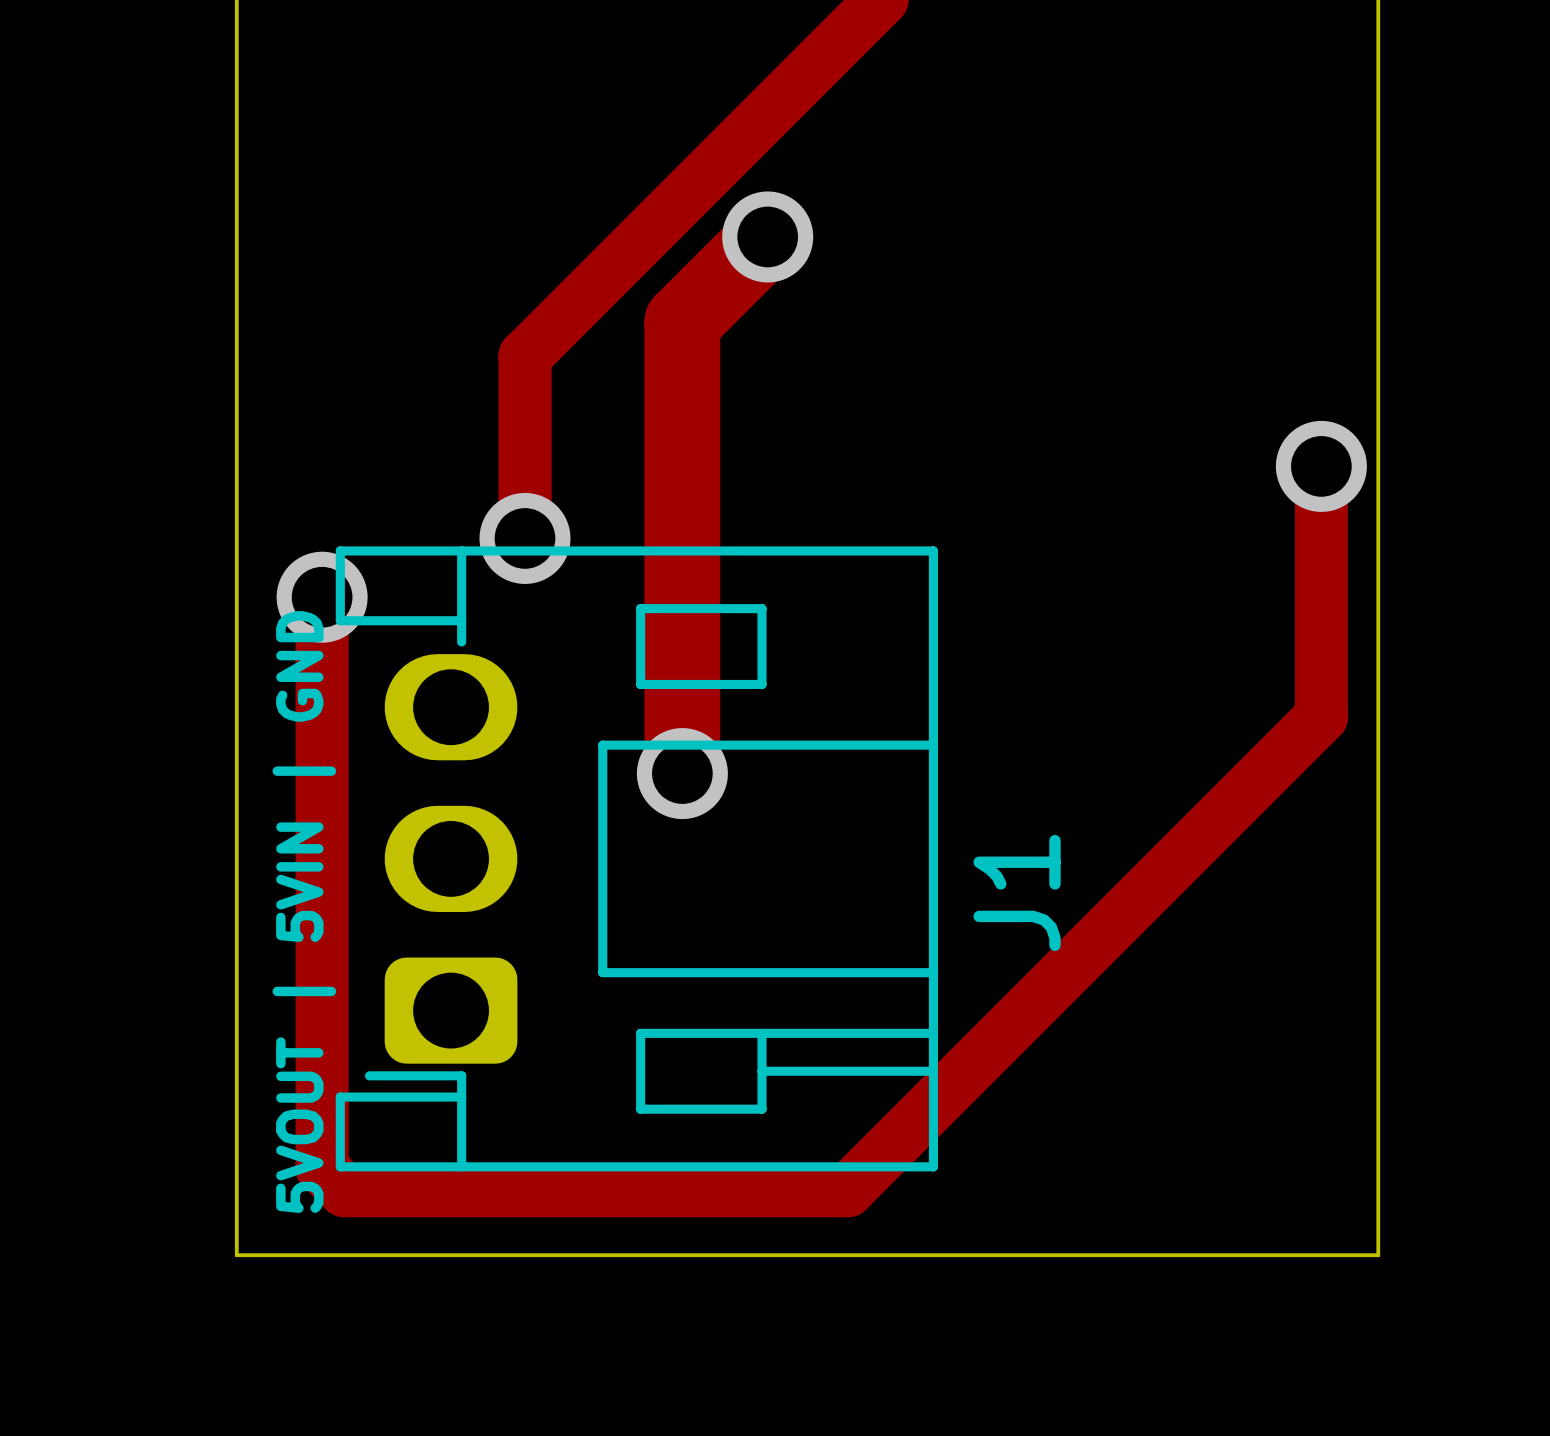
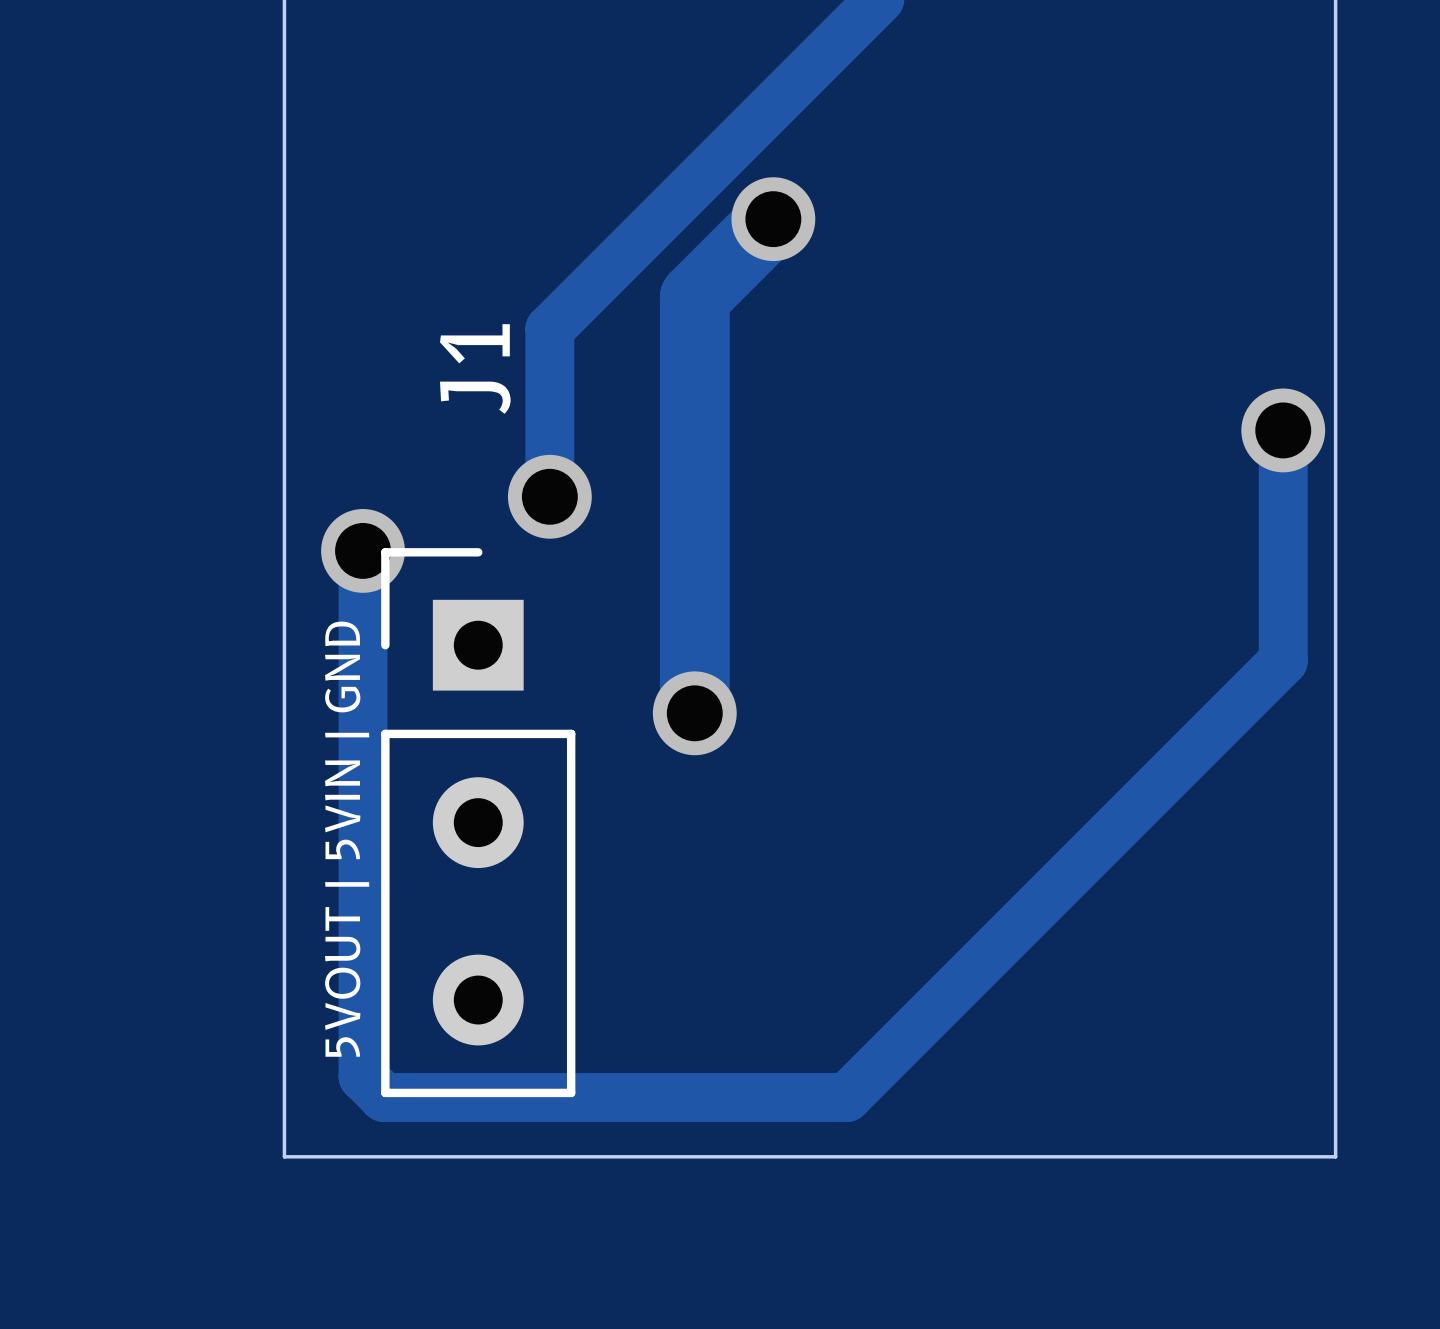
J1 footprint: [335, 546, 938, 1172] -> [381, 548, 576, 1098]
J1 name position: J1 (1017, 892) -> J1 (475, 368)

